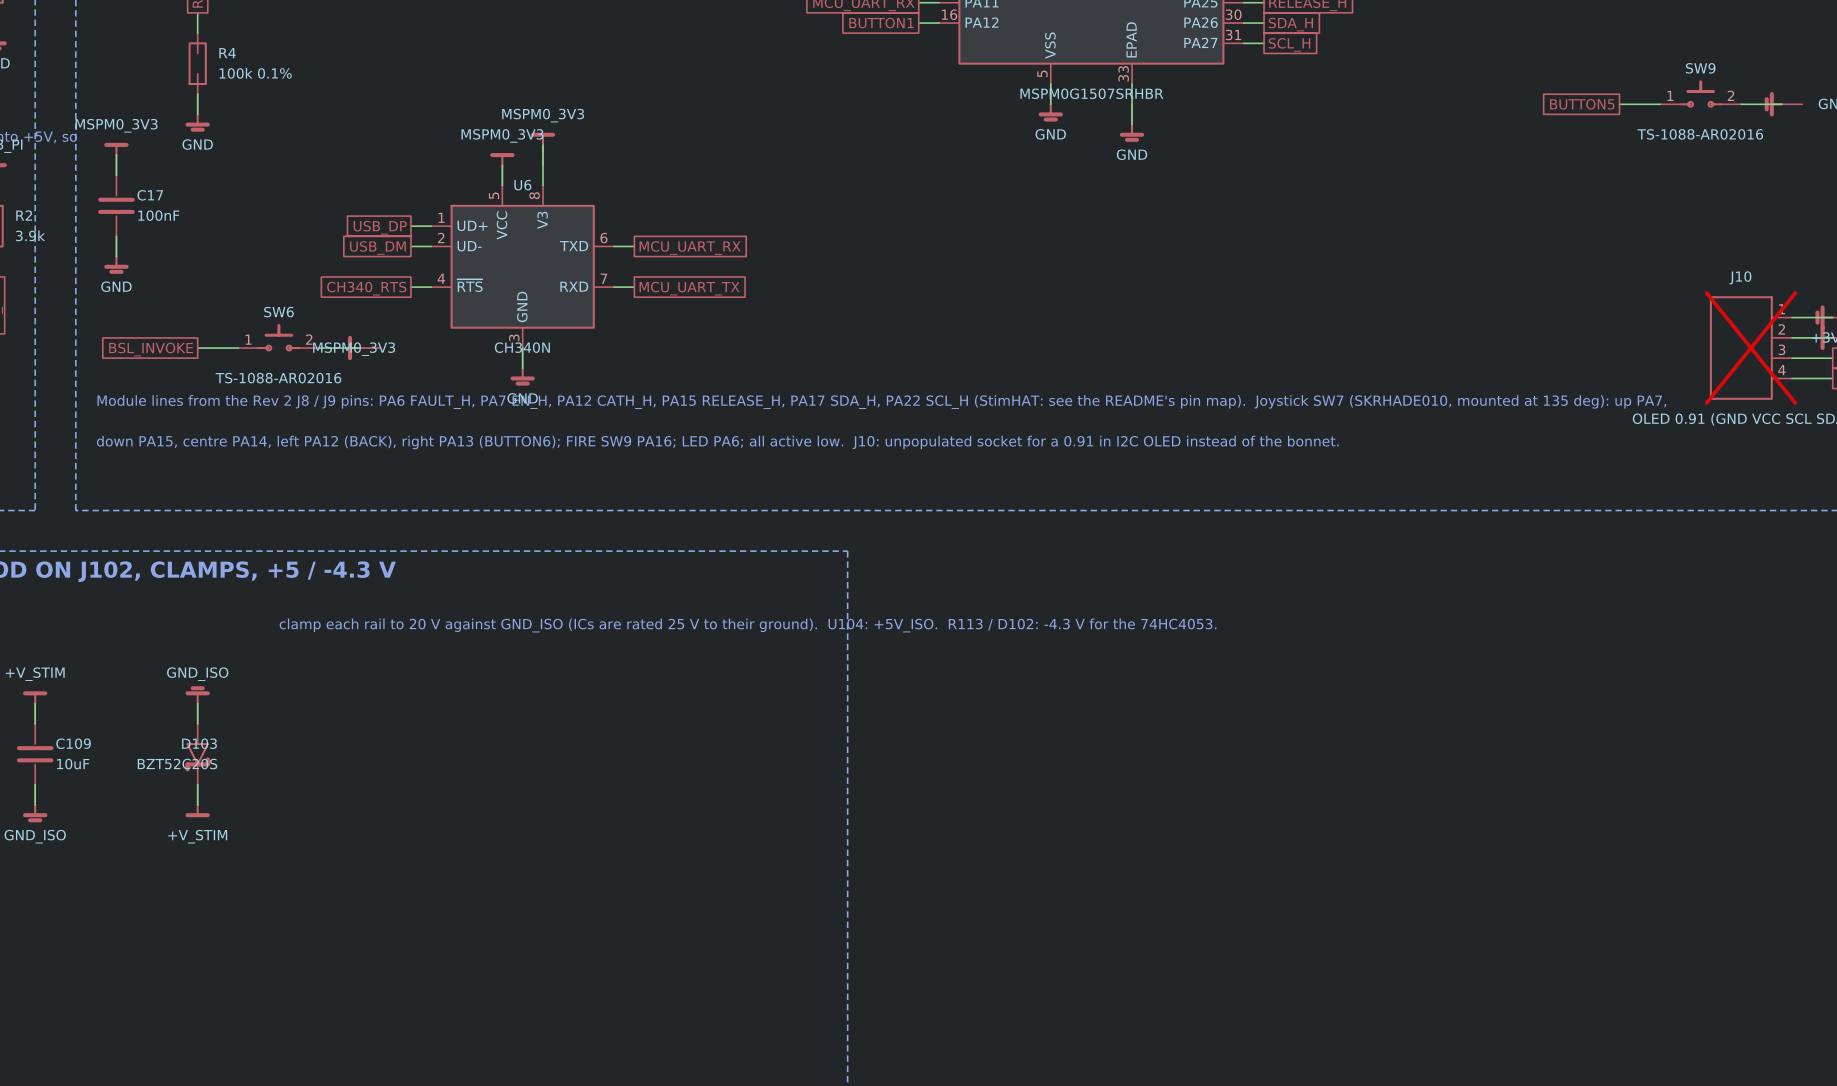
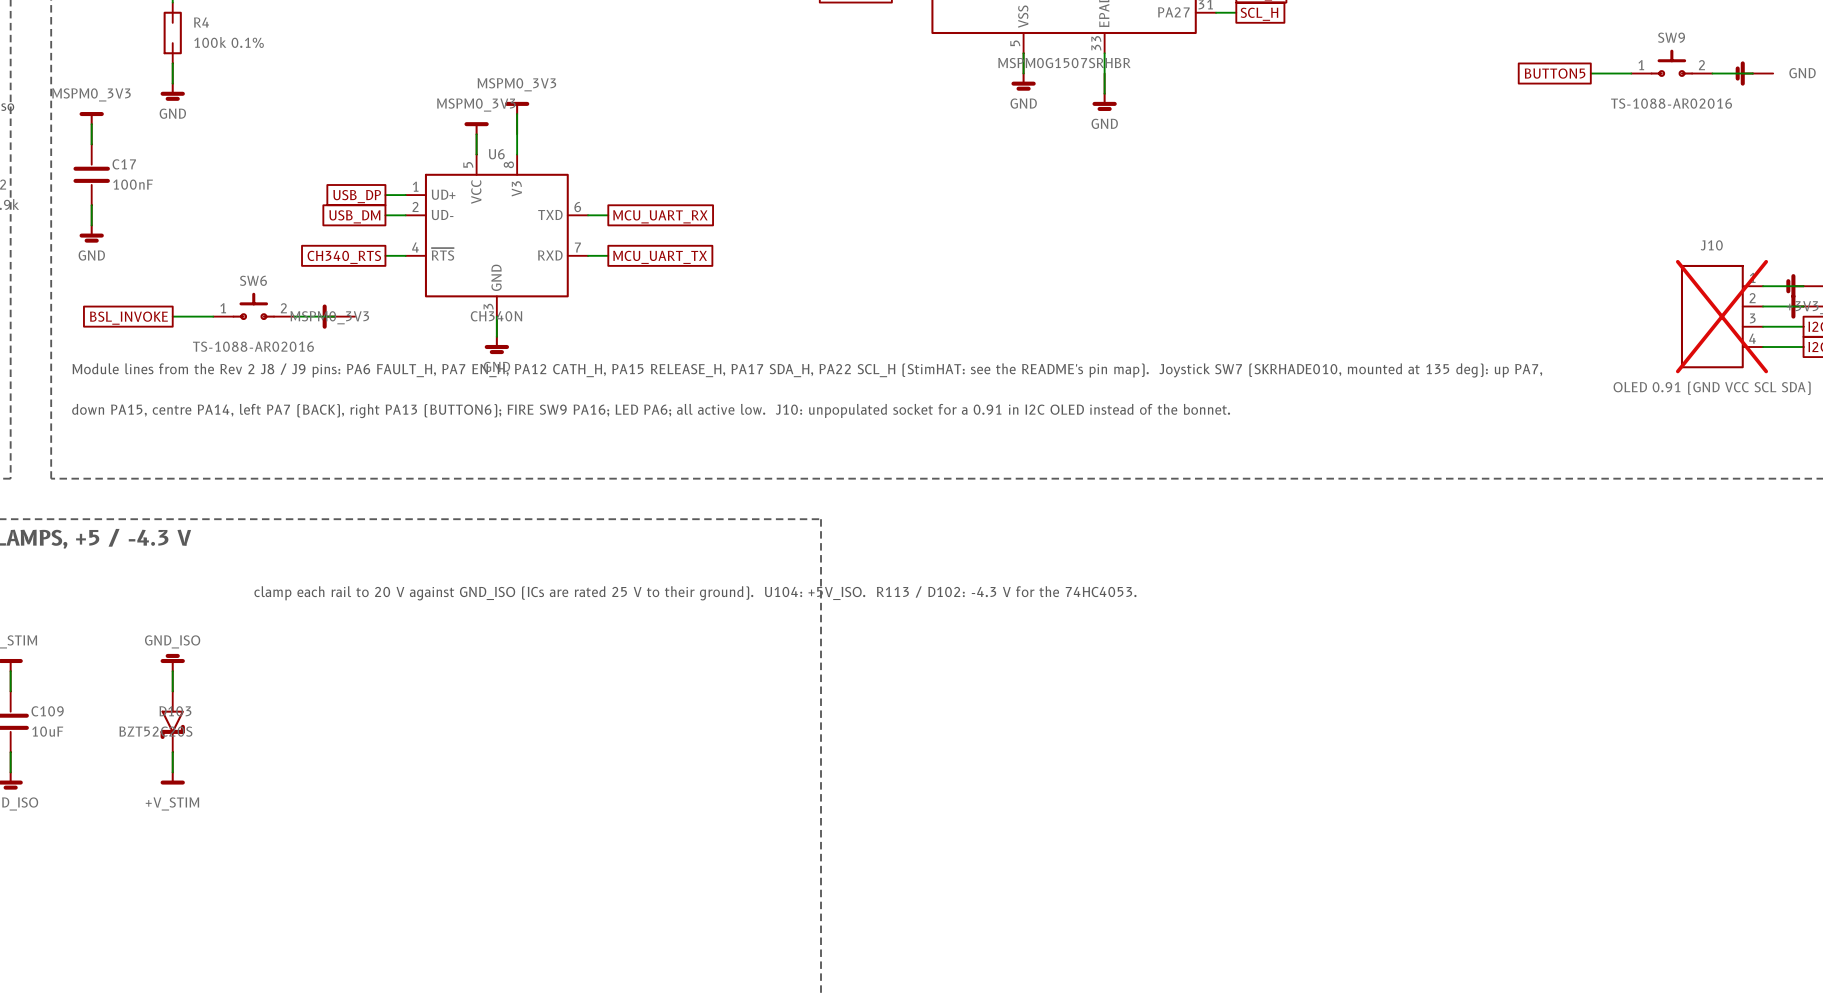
text: down PA15, centre PA14, left PA12 (BACK), right PA13 (BUTTON6); FIRE SW9 PA16; LED PA6; all active low. J10: unpopulated socket for a 0.91 in I2C OLED instead of the bonnet. (717, 442) -> down PA15, centre PA14, left PA7 (BACK), right PA13 (BUTTON6); FIRE SW9 PA16; LED PA6; all active low. J10: unpopulated socket for a 0.91 in I2C OLED instead of the bonnet. (651, 410)

